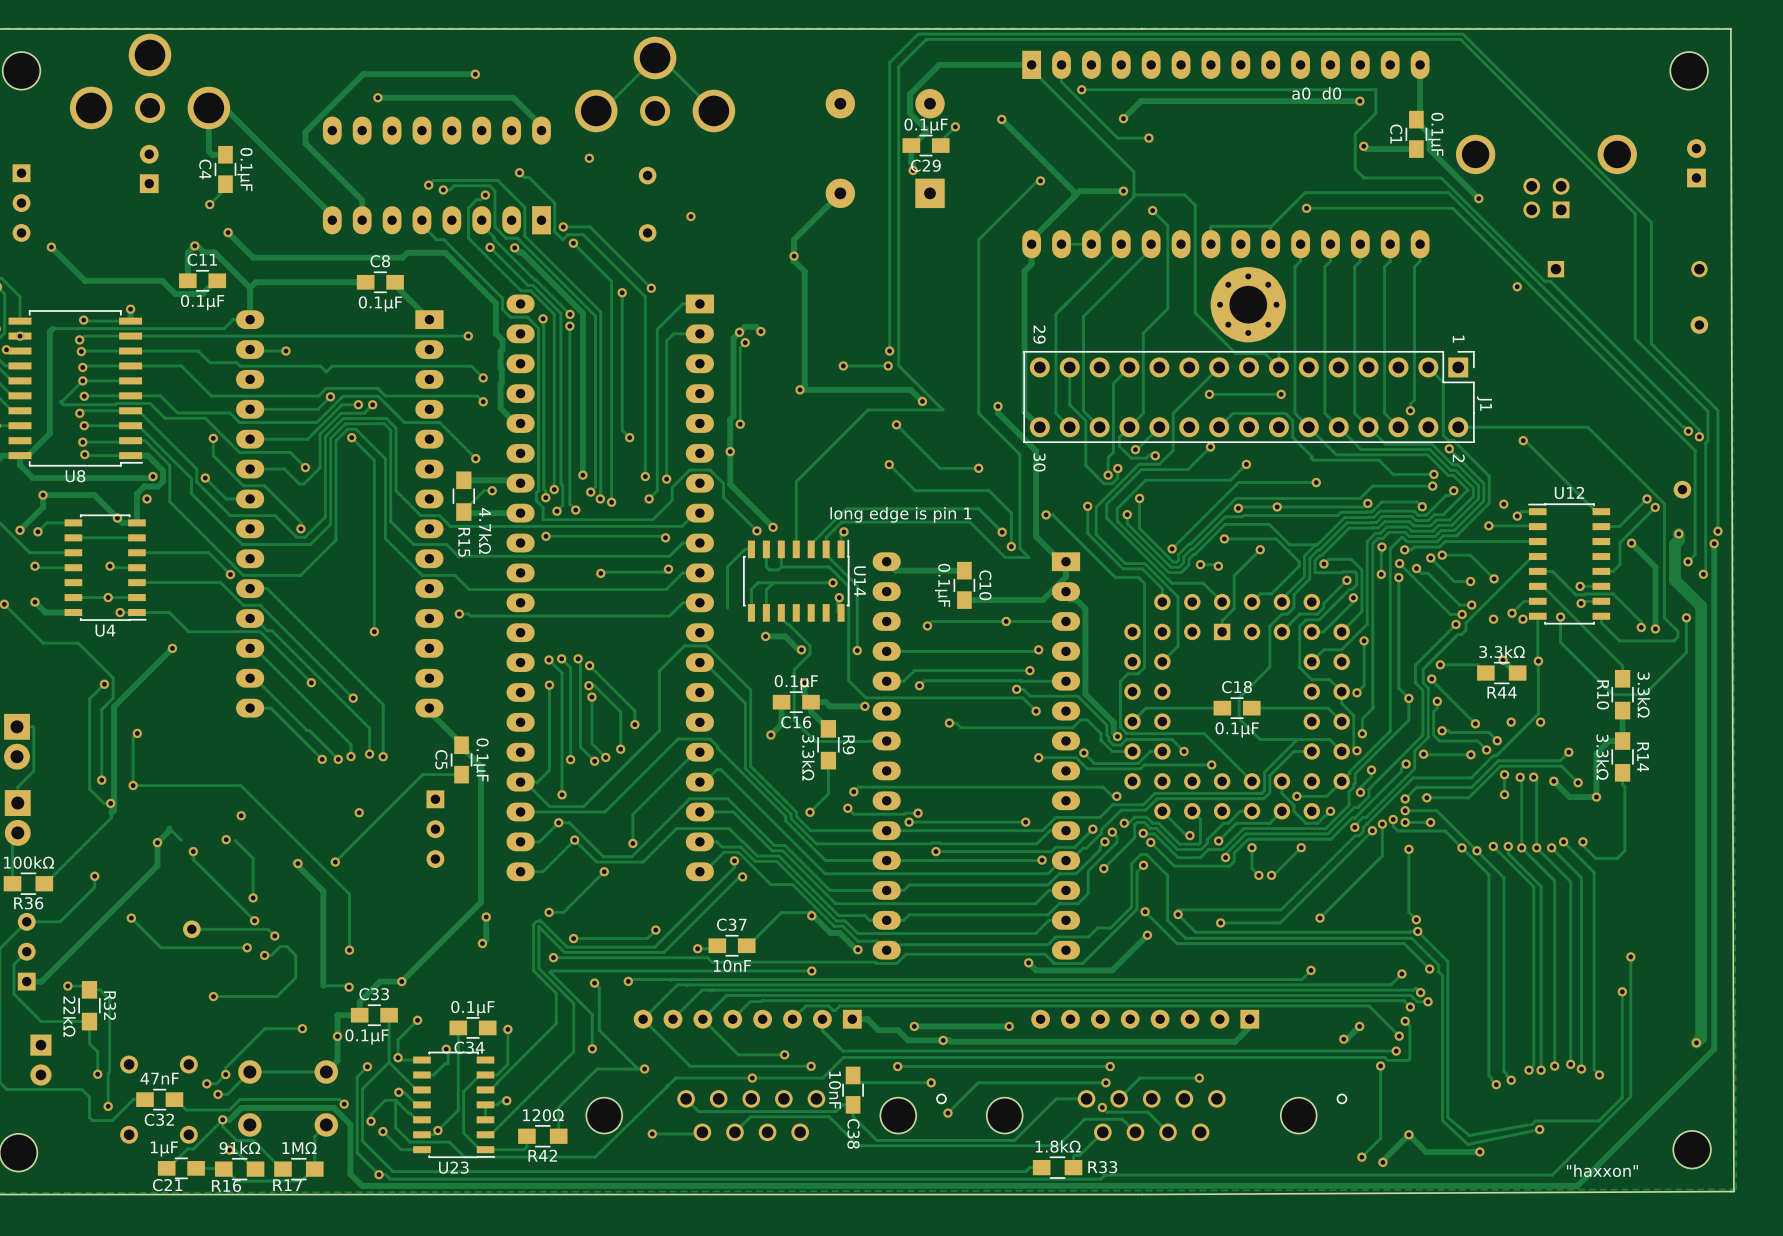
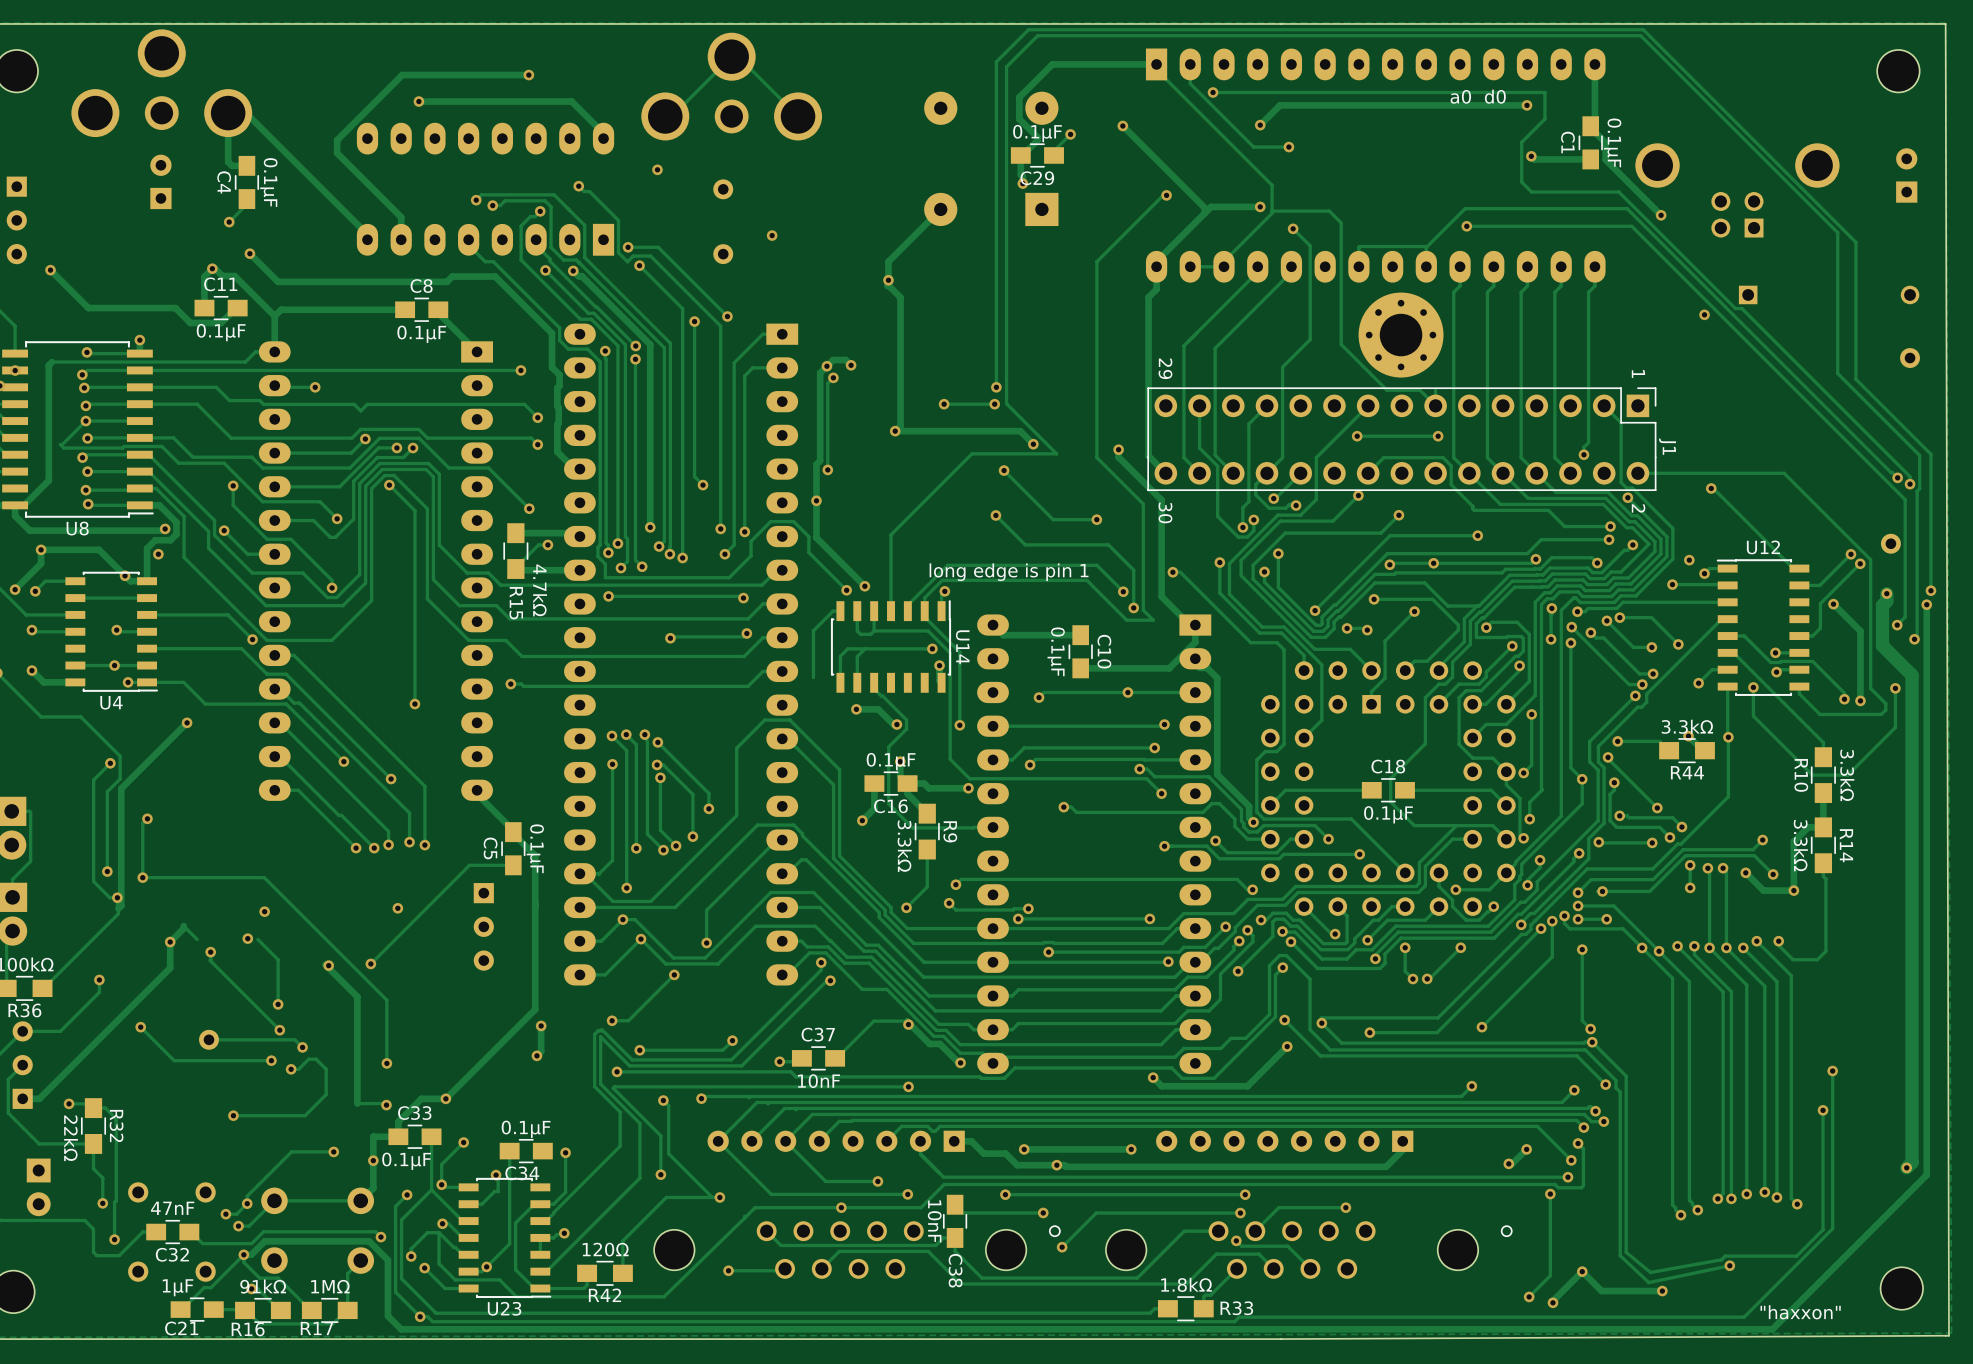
via: (1493, 619) -> none
via: (1522, 619) -> none
via: (1511, 722) -> none
via: (1540, 722) -> none

